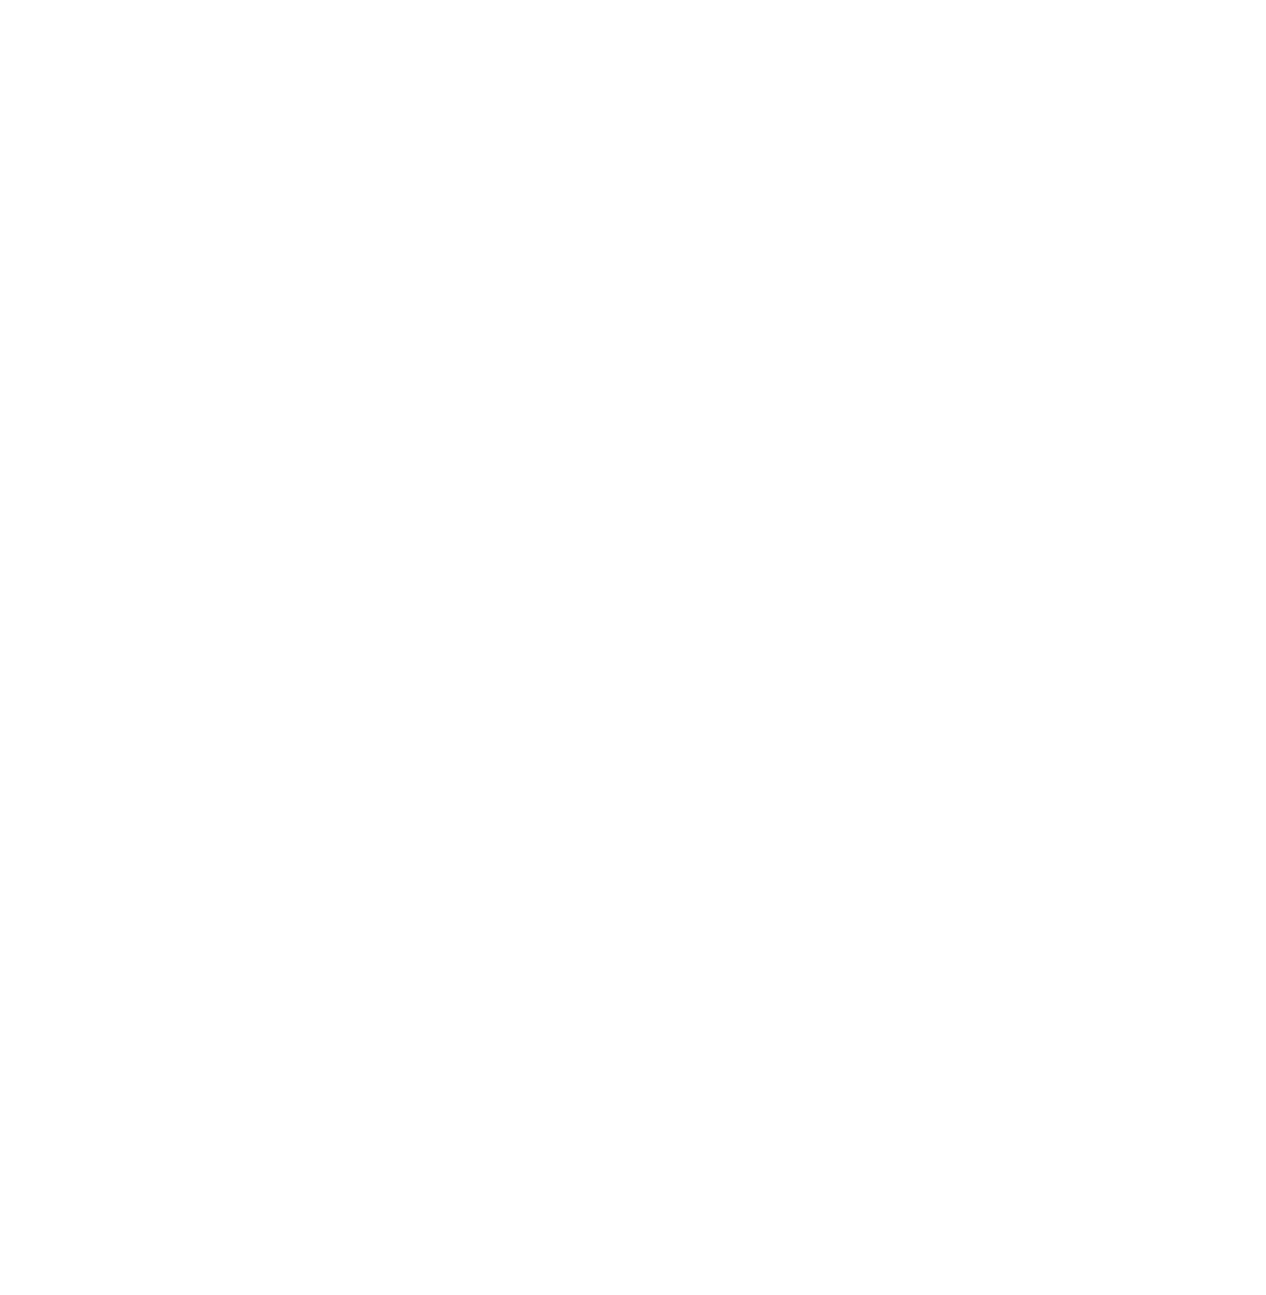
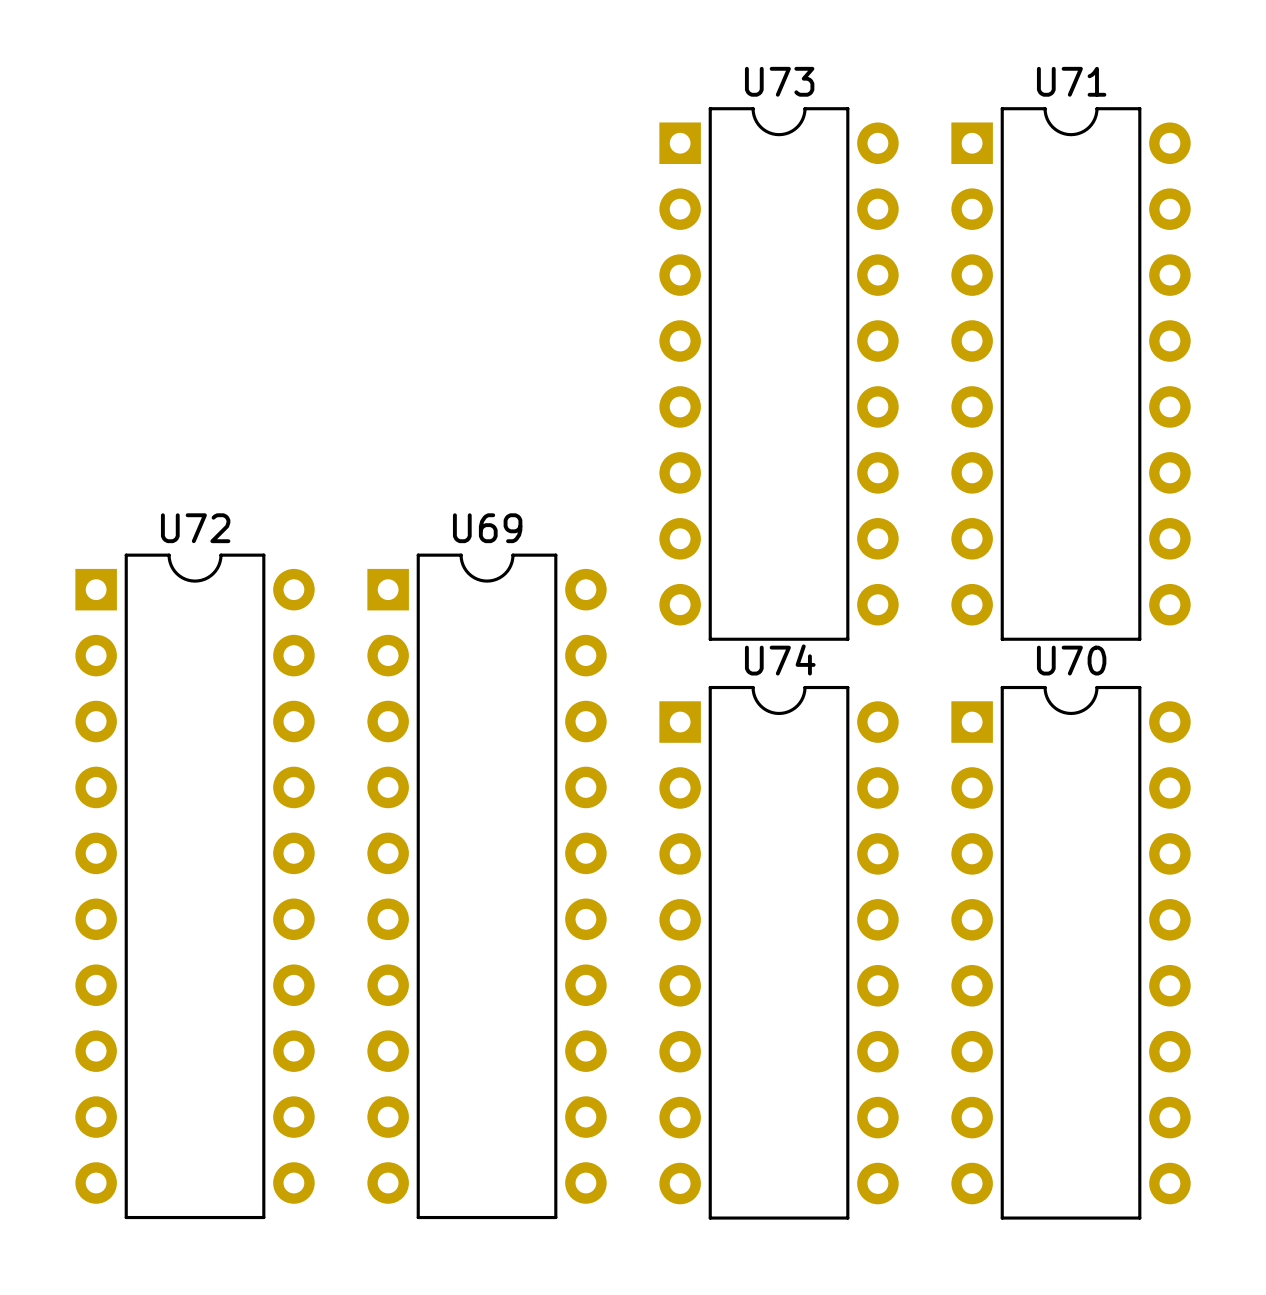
U73: none -> (779, 373)
U71: none -> (1071, 373)
U72: none -> (195, 886)
U69: none -> (487, 886)
U74: none -> (779, 952)
U70: none -> (1071, 952)

